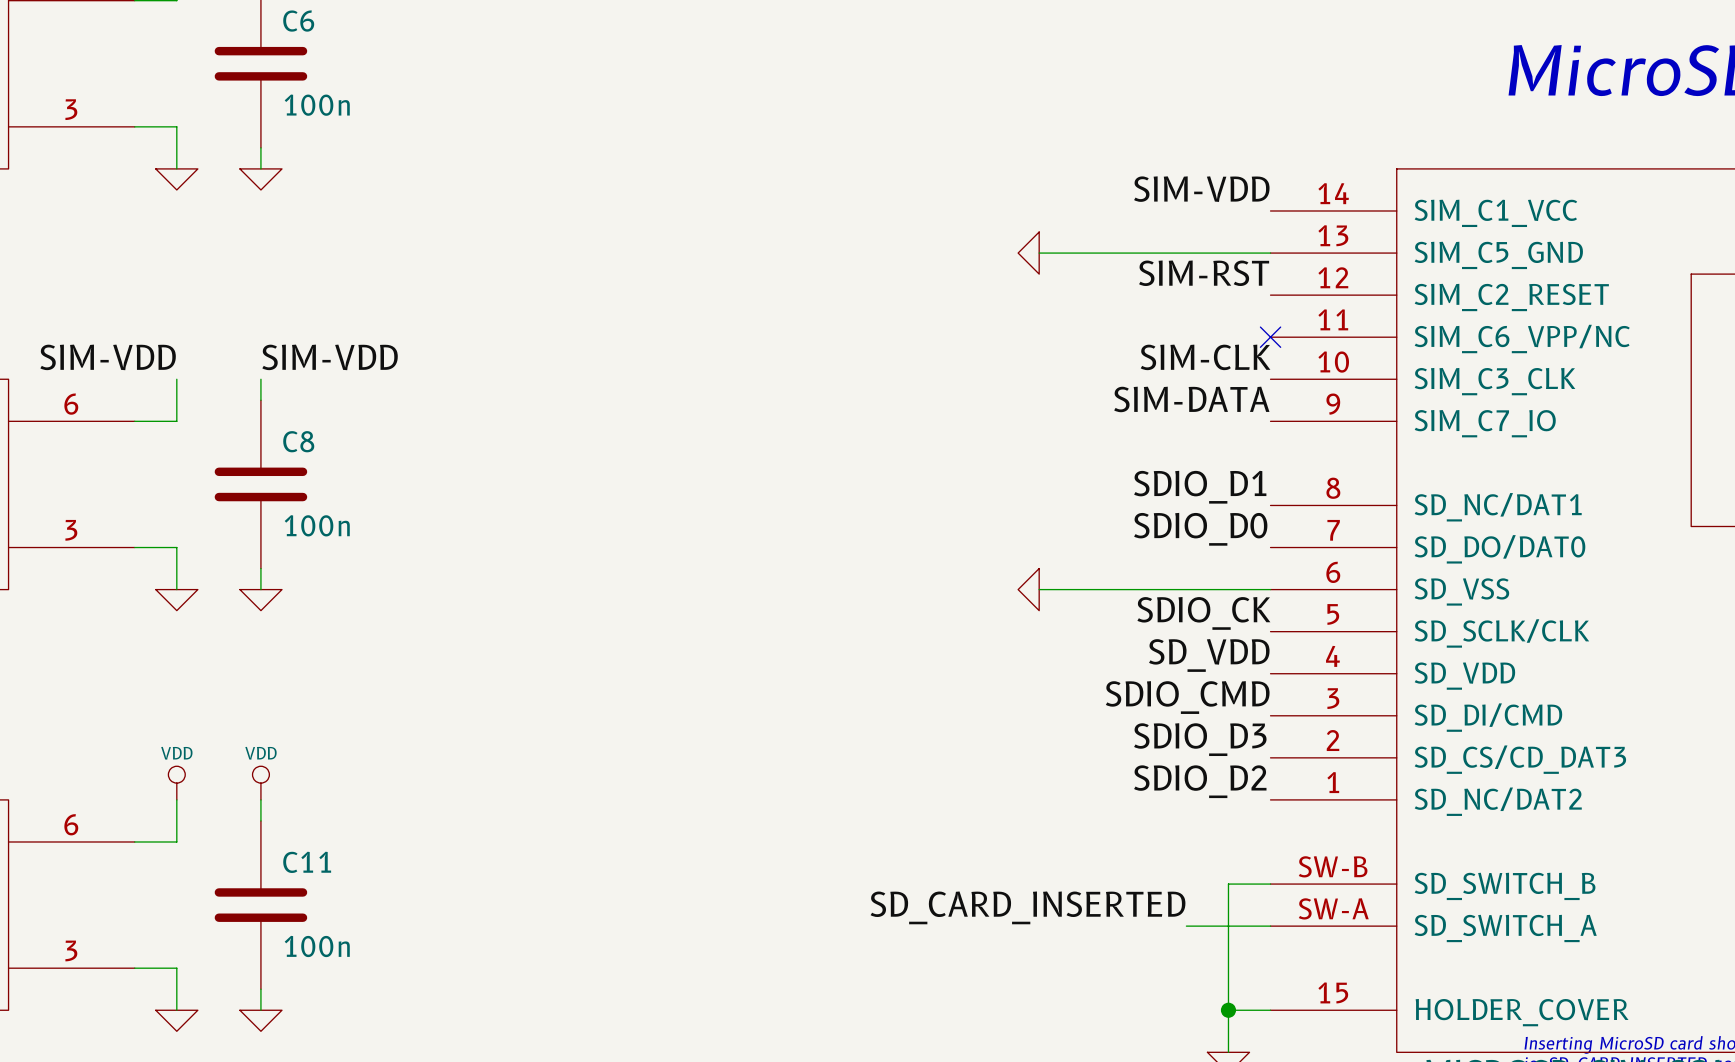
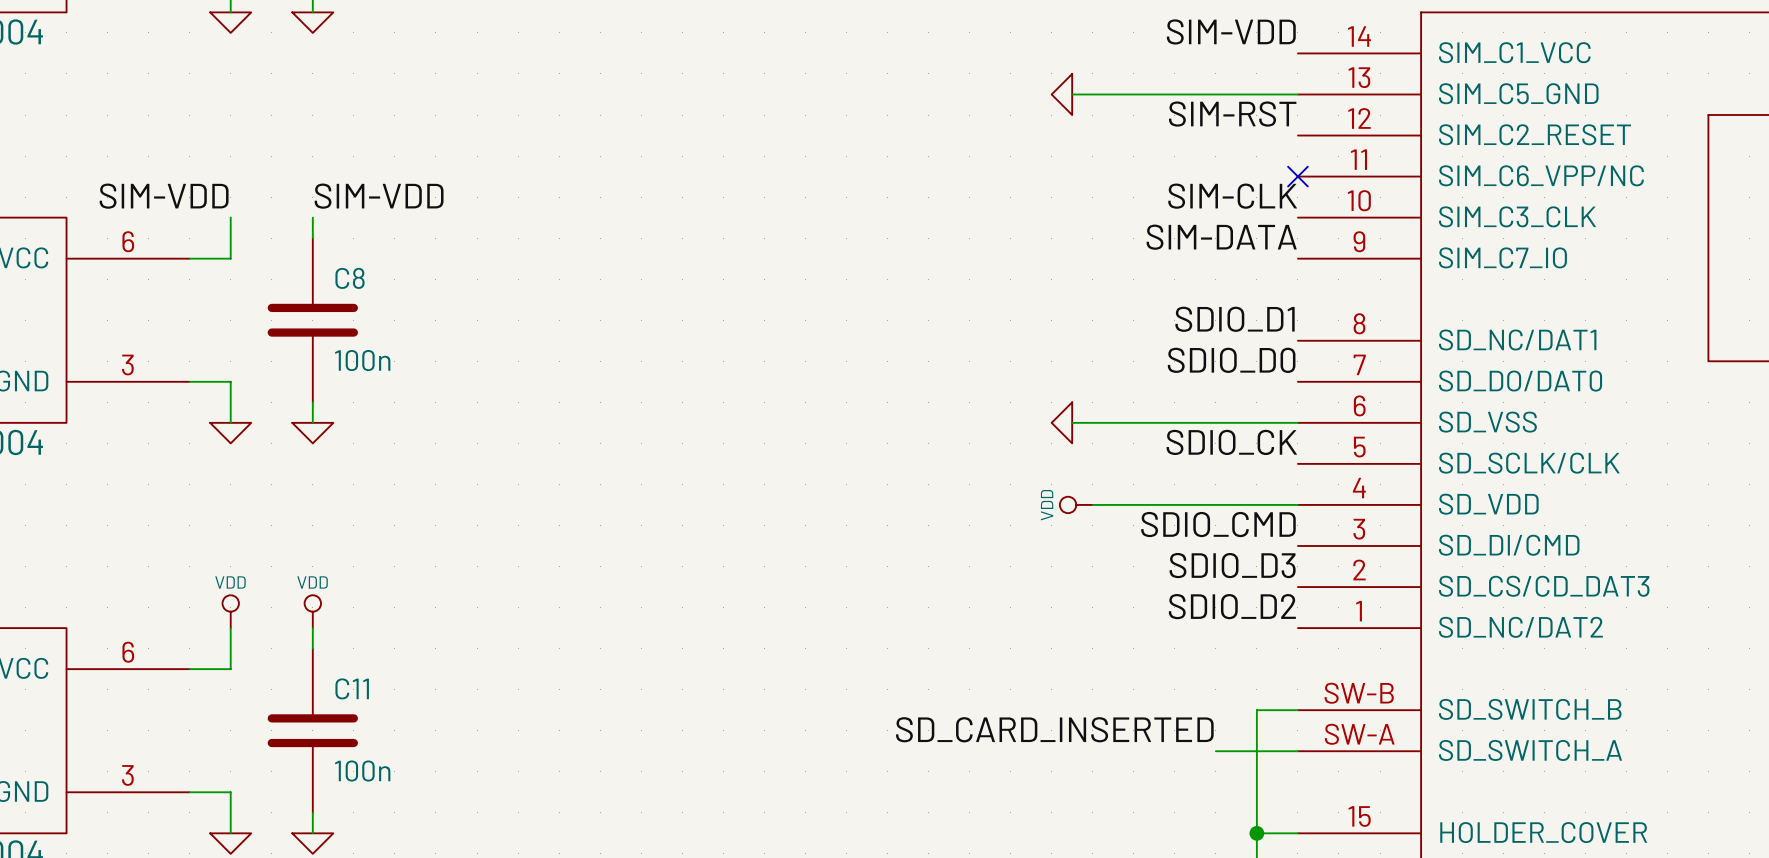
label: SD_VDD (1209, 655) -> none
power symbol: none -> VDD (1076, 504)
wire: none -> (1092, 504) (1297, 504)

